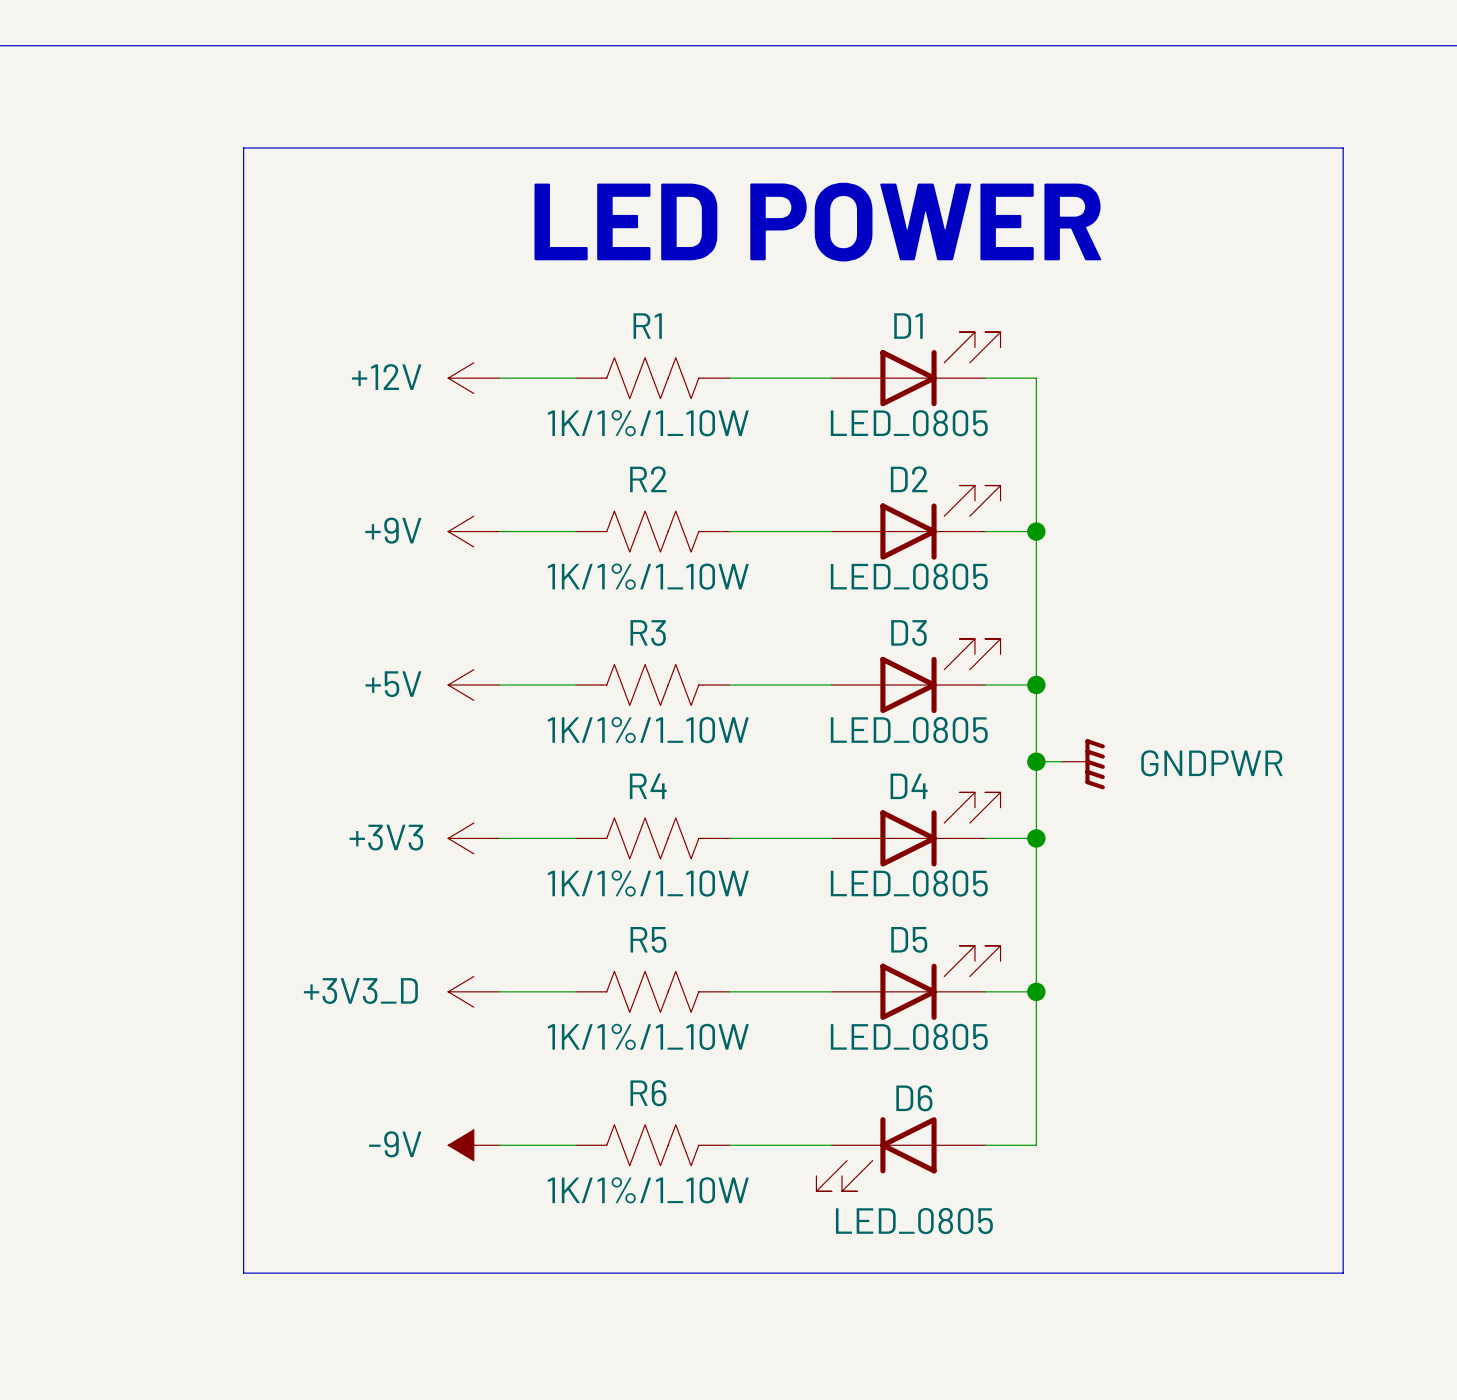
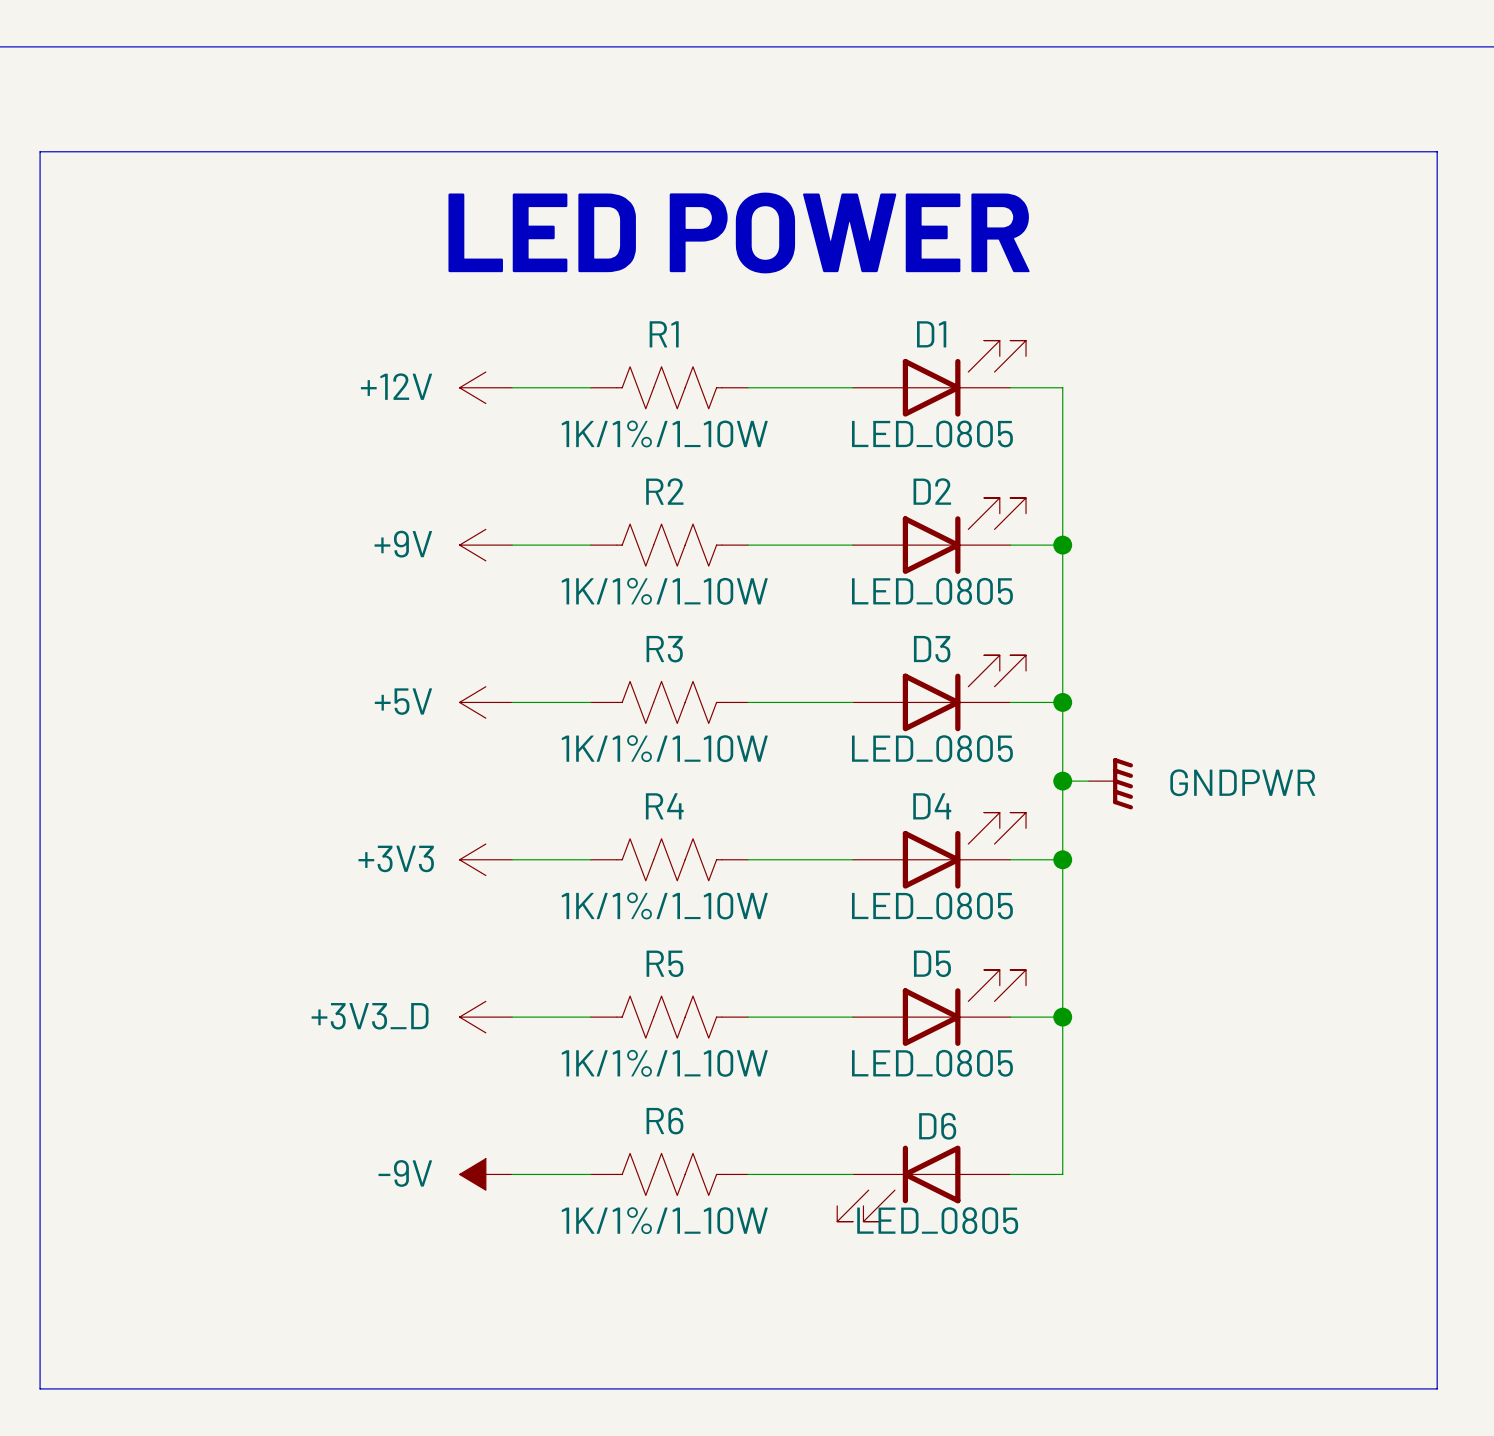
line: (243, 148) (243, 1273) (1343, 1273) (1343, 148) -> (249, 151) (40, 151) (40, 1388) (1437, 1388) (1437, 151) (1377, 151)
text position: LED POWER (817, 222) -> LED POWER (739, 232)
D6 value position: LED_0805 (914, 1221) -> LED_0805 (937, 1220)

